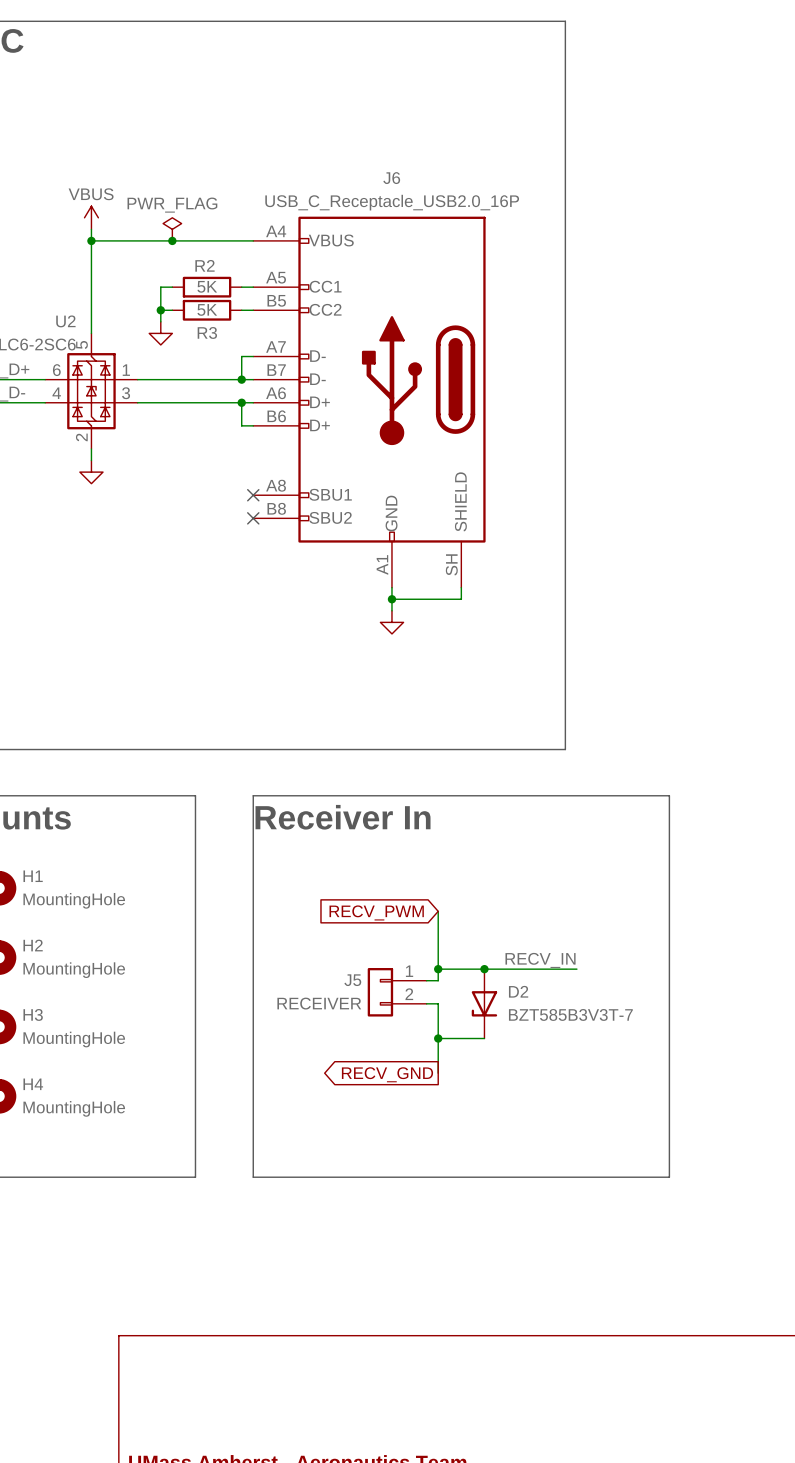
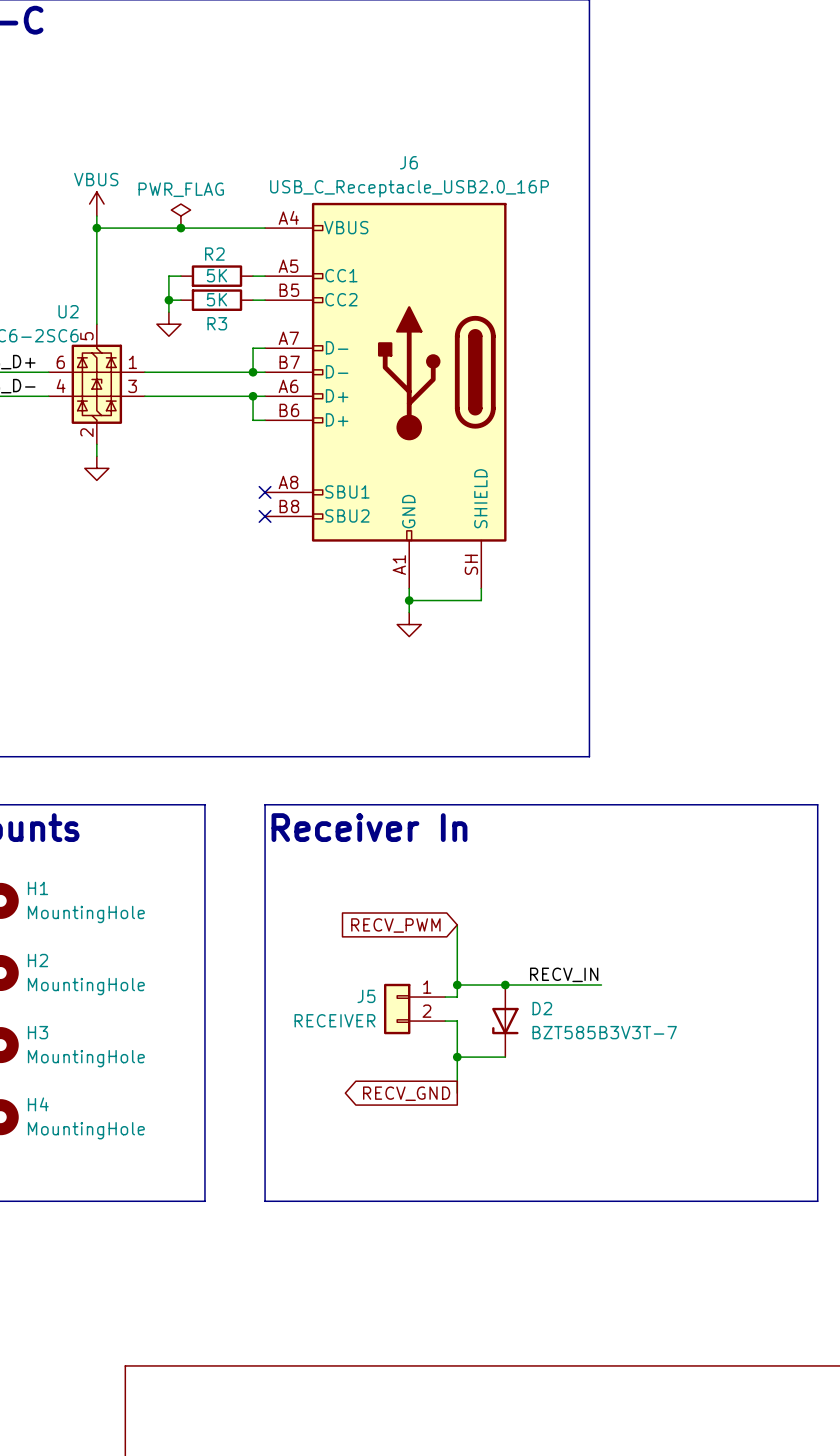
line: (669, 795) (669, 1177) -> (697, 804) (817, 804) (817, 1201) (697, 1201)

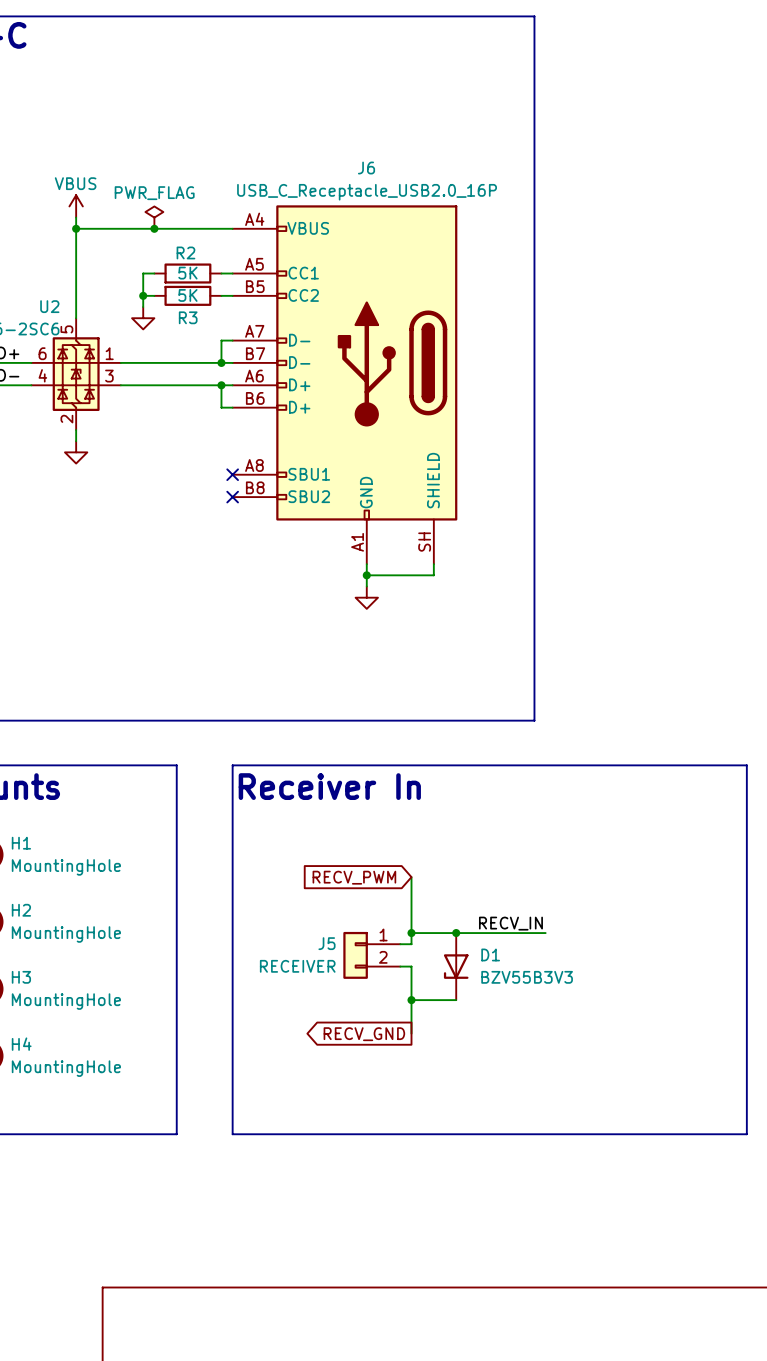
D2 name: D2 (542, 1008) -> D1 (490, 954)
D2 value: BZT585B3V3T-7 (604, 1032) -> BZV55B3V3 (527, 977)

